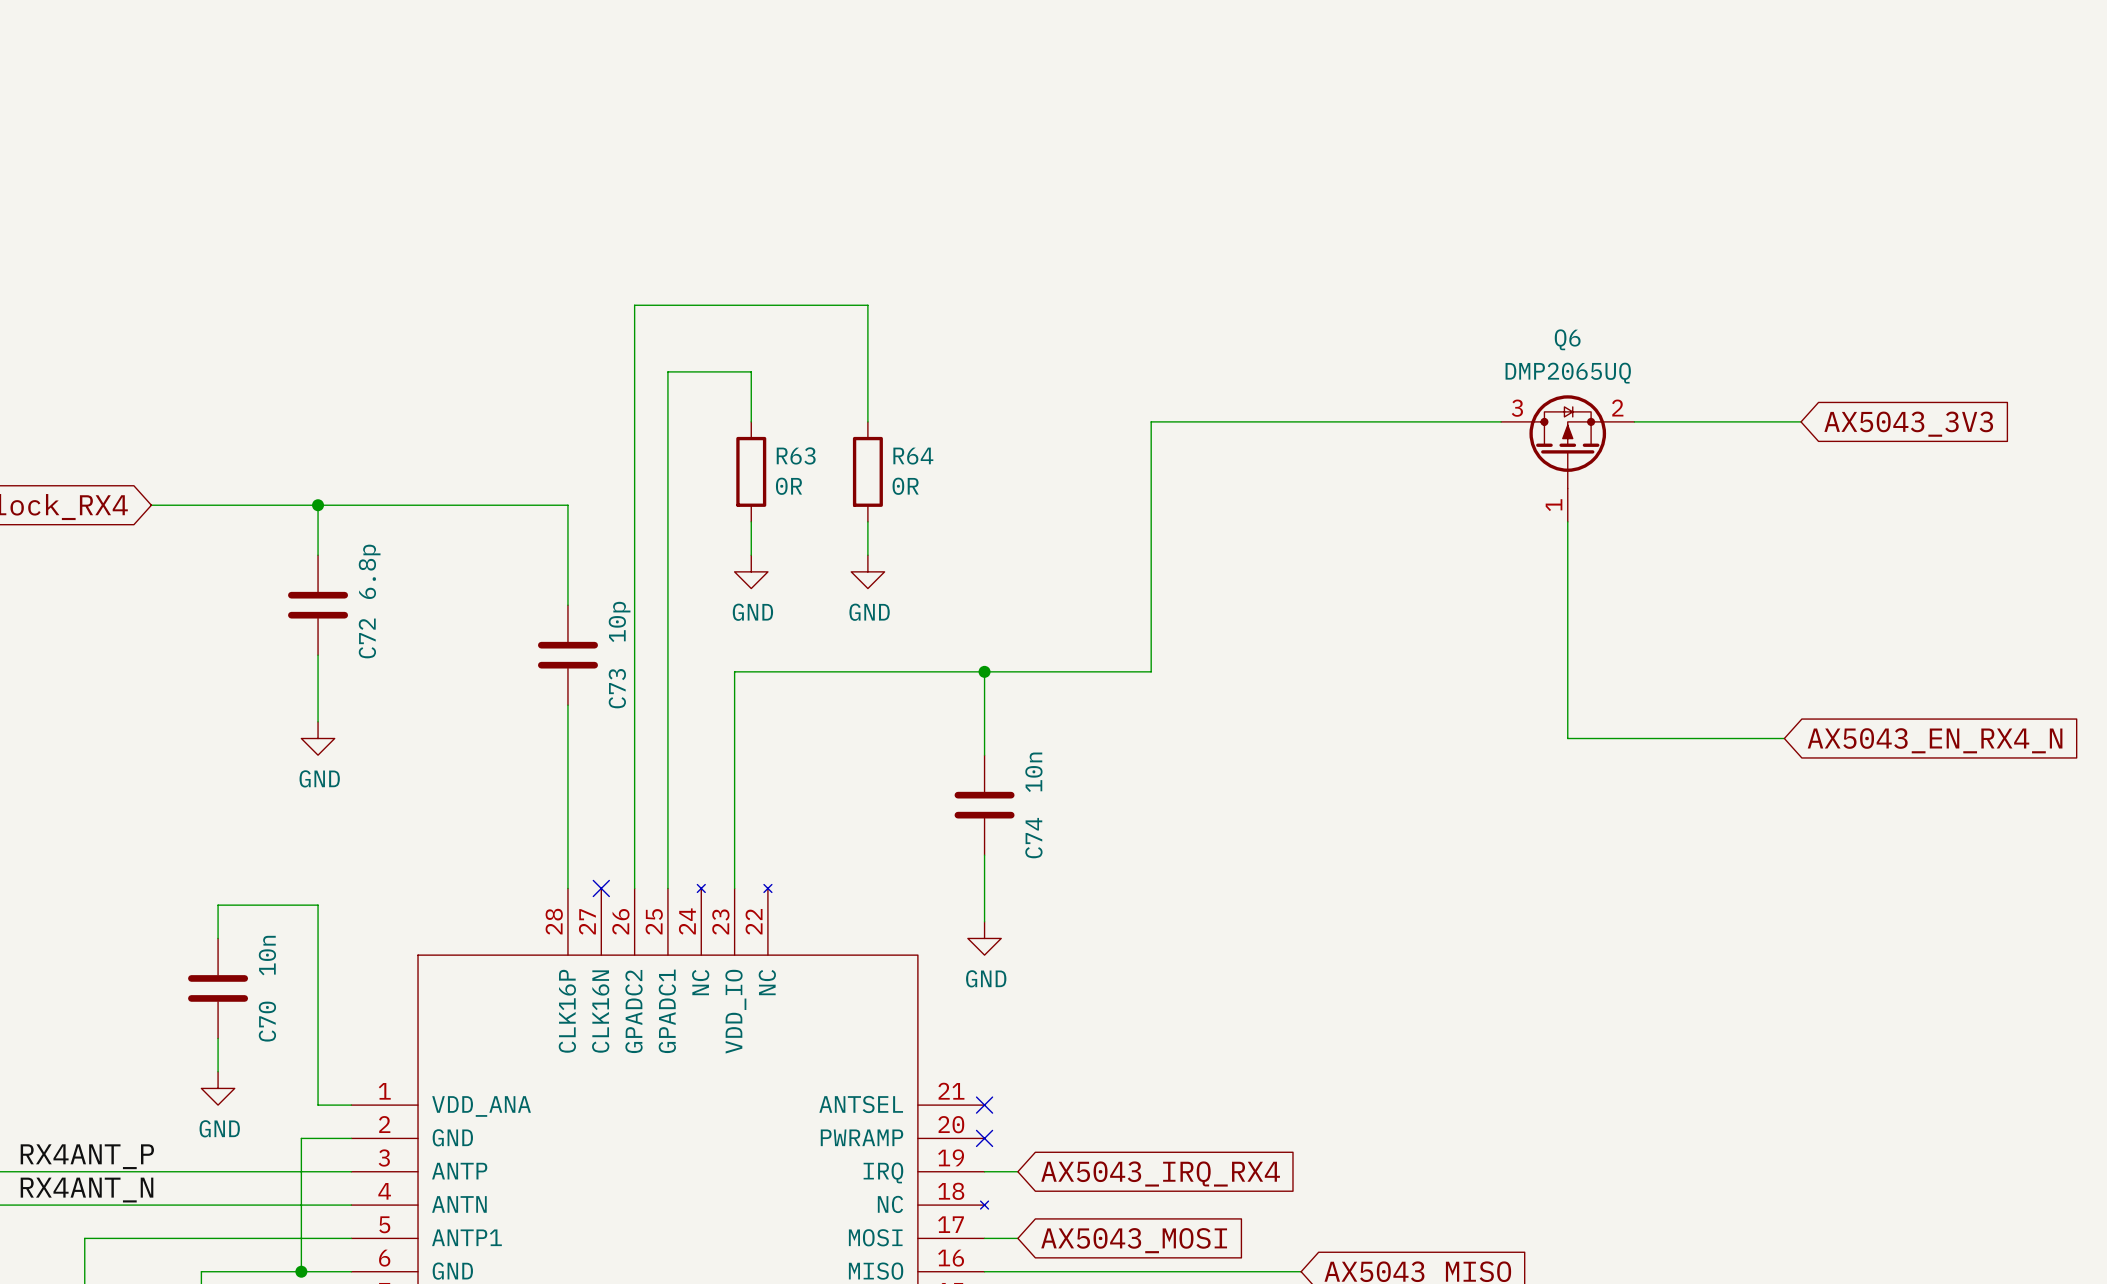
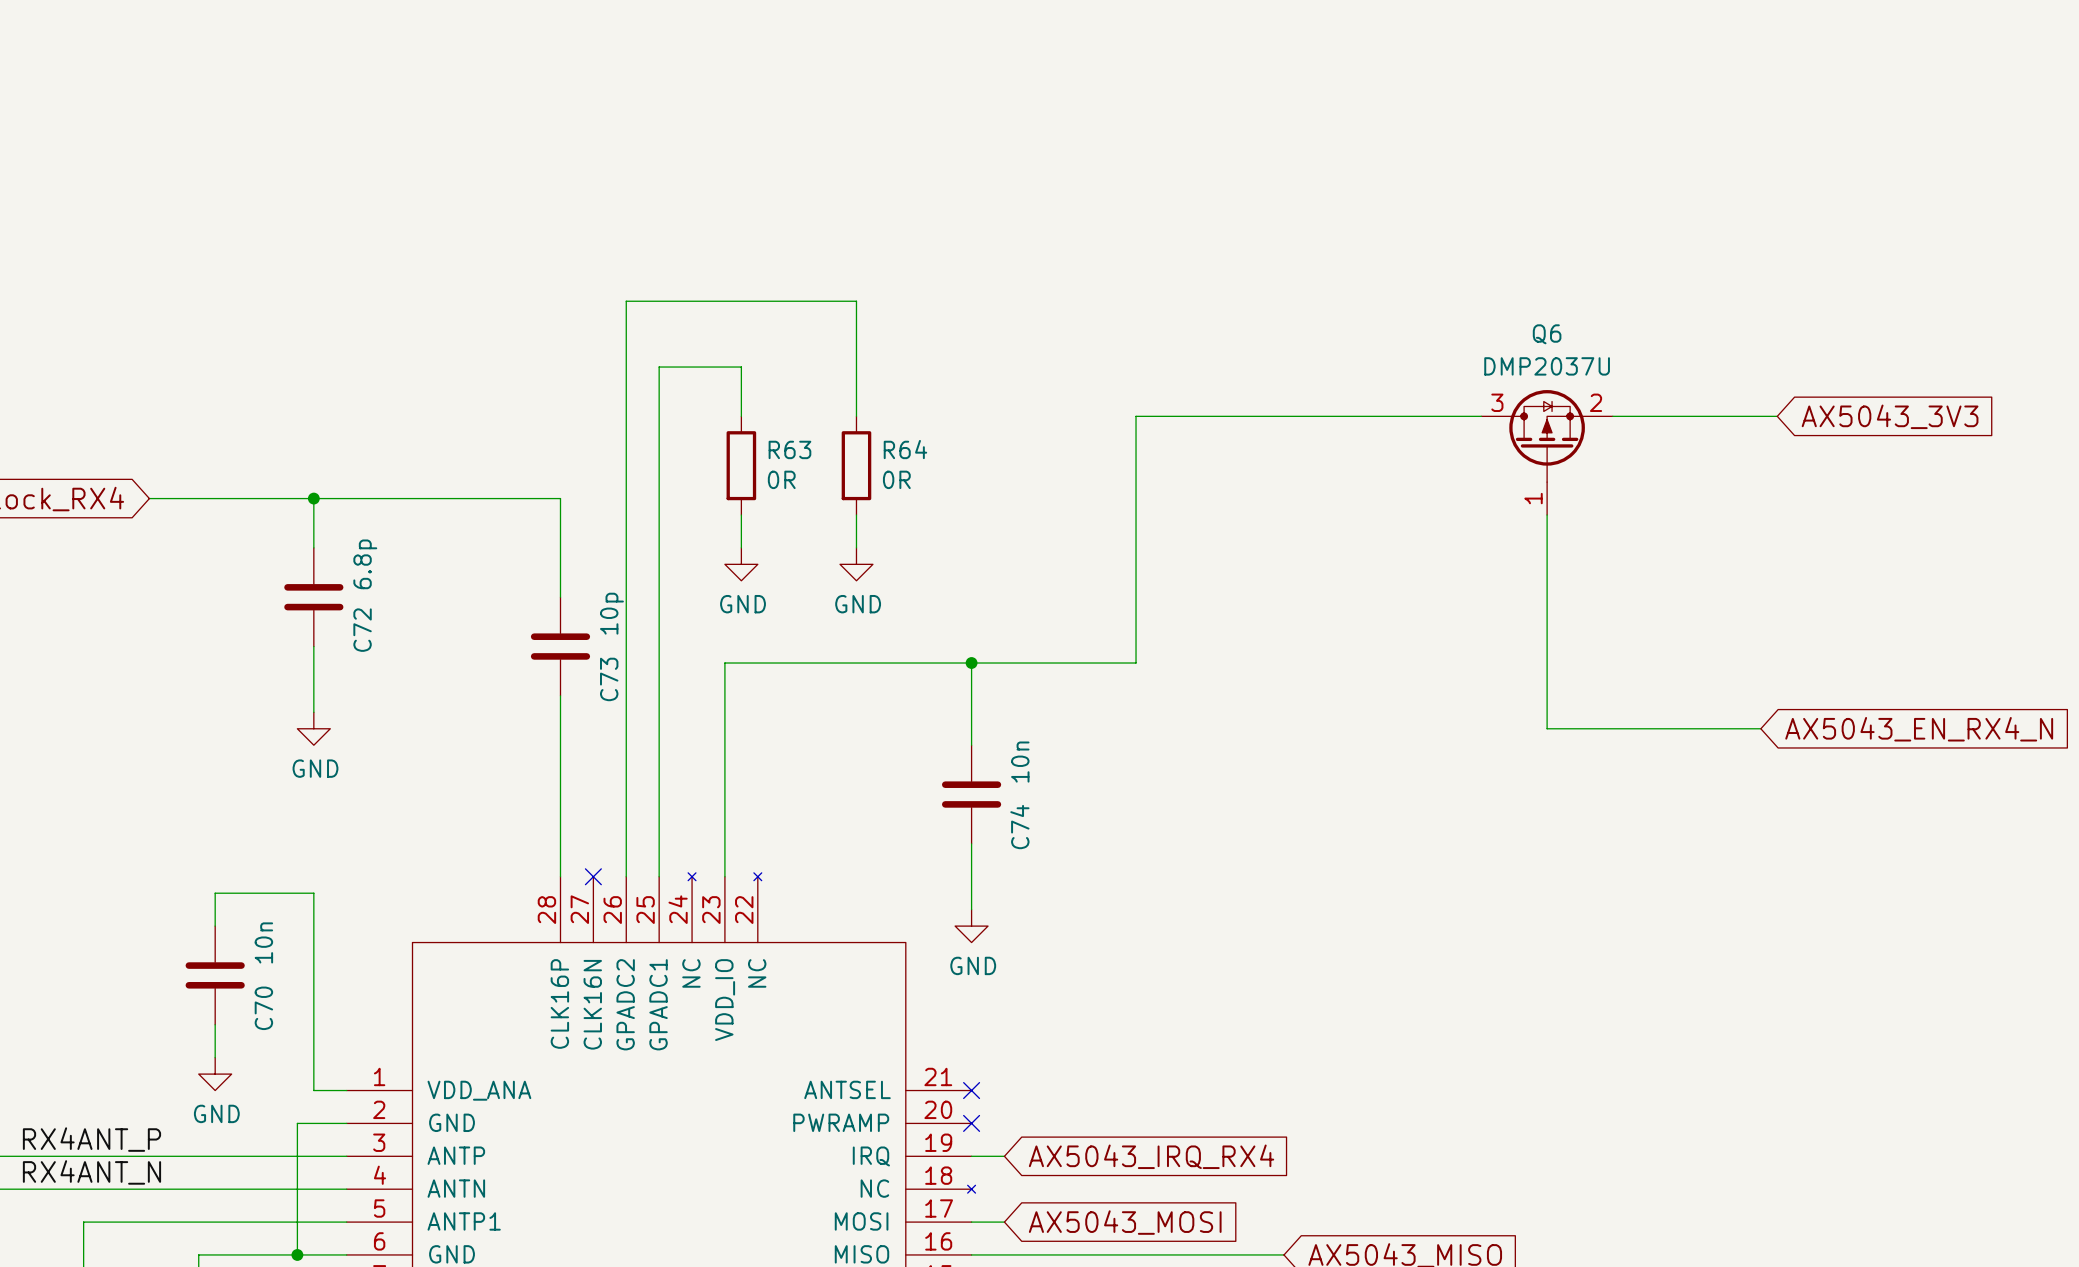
Q6 value: DMP2065UQ (1568, 373) -> DMP2037U (1547, 366)

